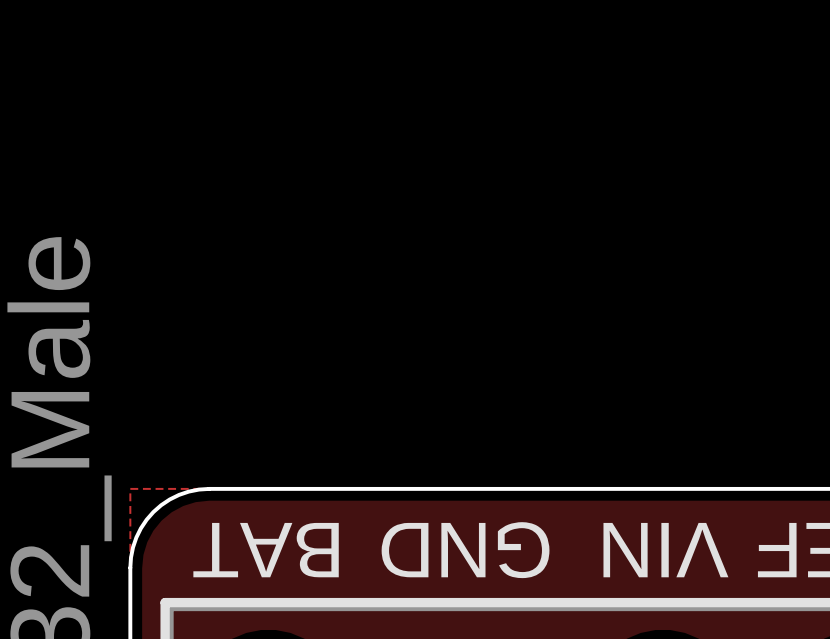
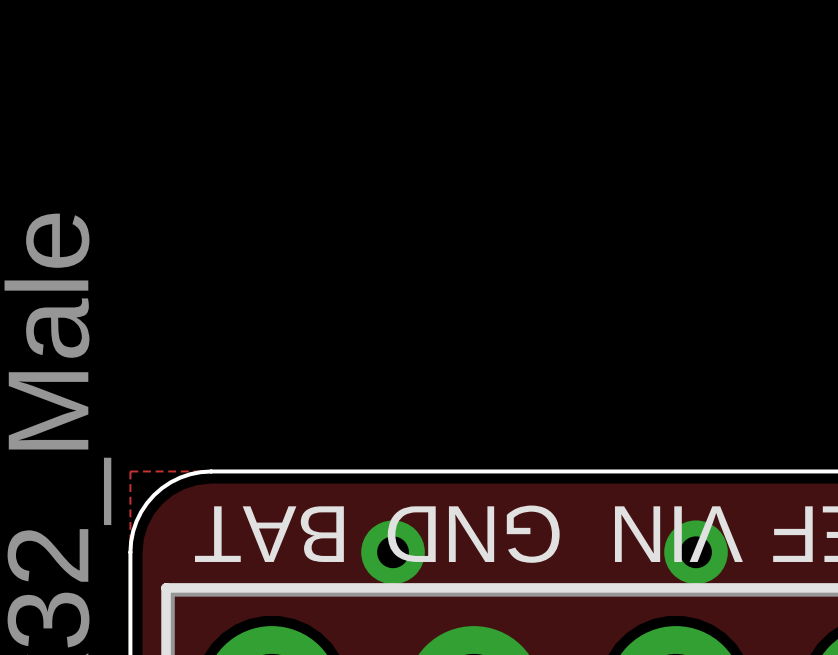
via: none -> (393, 552)
via: none -> (696, 552)

